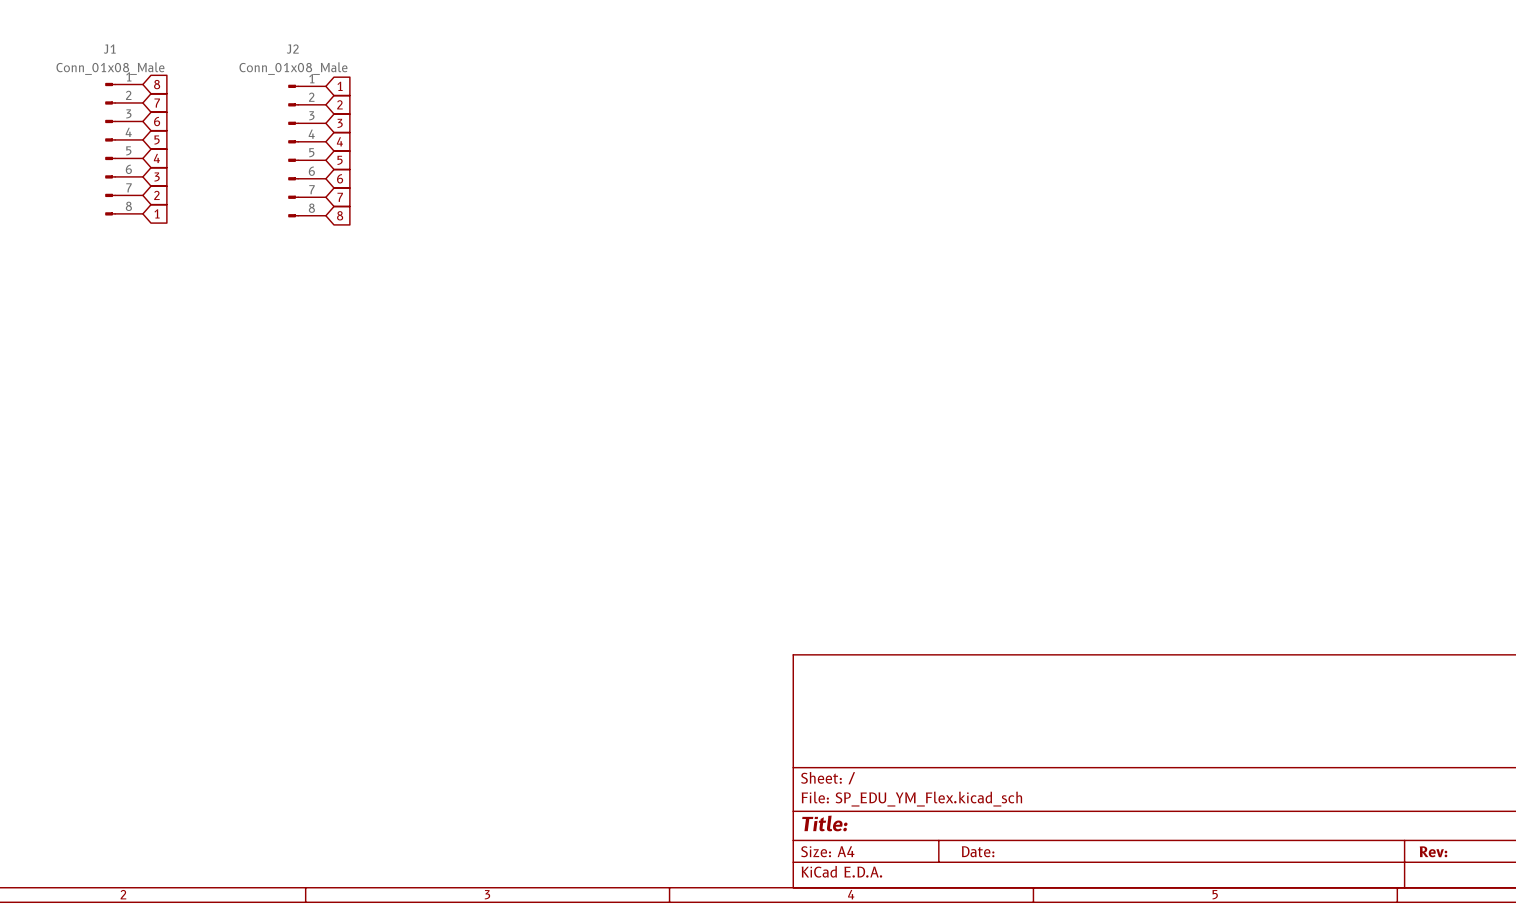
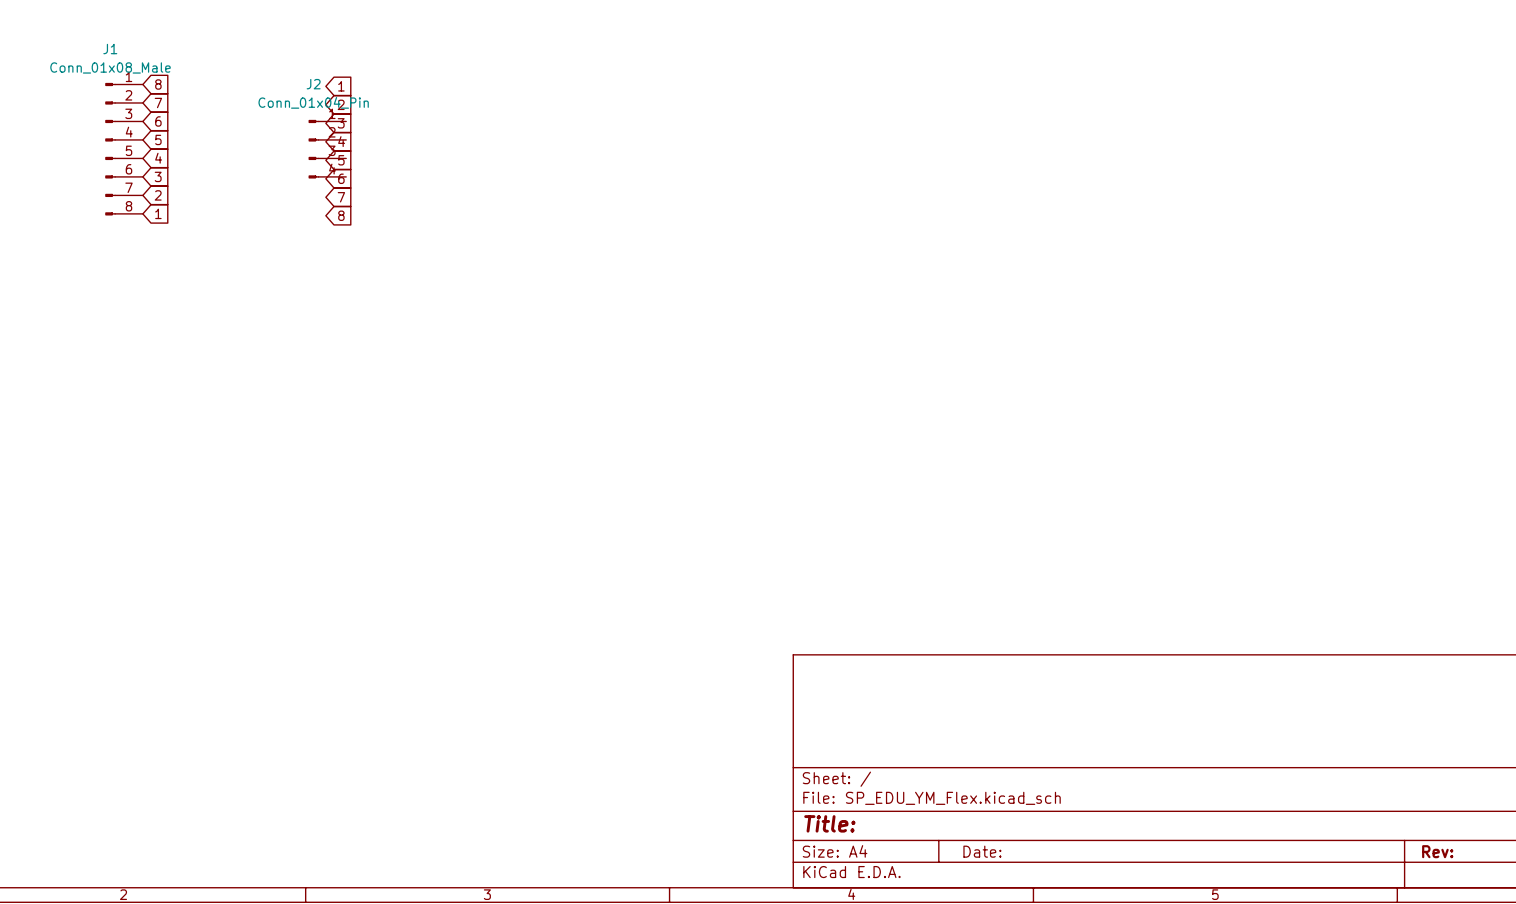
J2 name position: J2 (292, 49) -> J2 (313, 84)
J2 value: Conn_01x08_Male (293, 68) -> Conn_01x04_Pin (313, 102)
J2 symbol: [288, 84, 326, 218] -> [308, 119, 347, 179]

